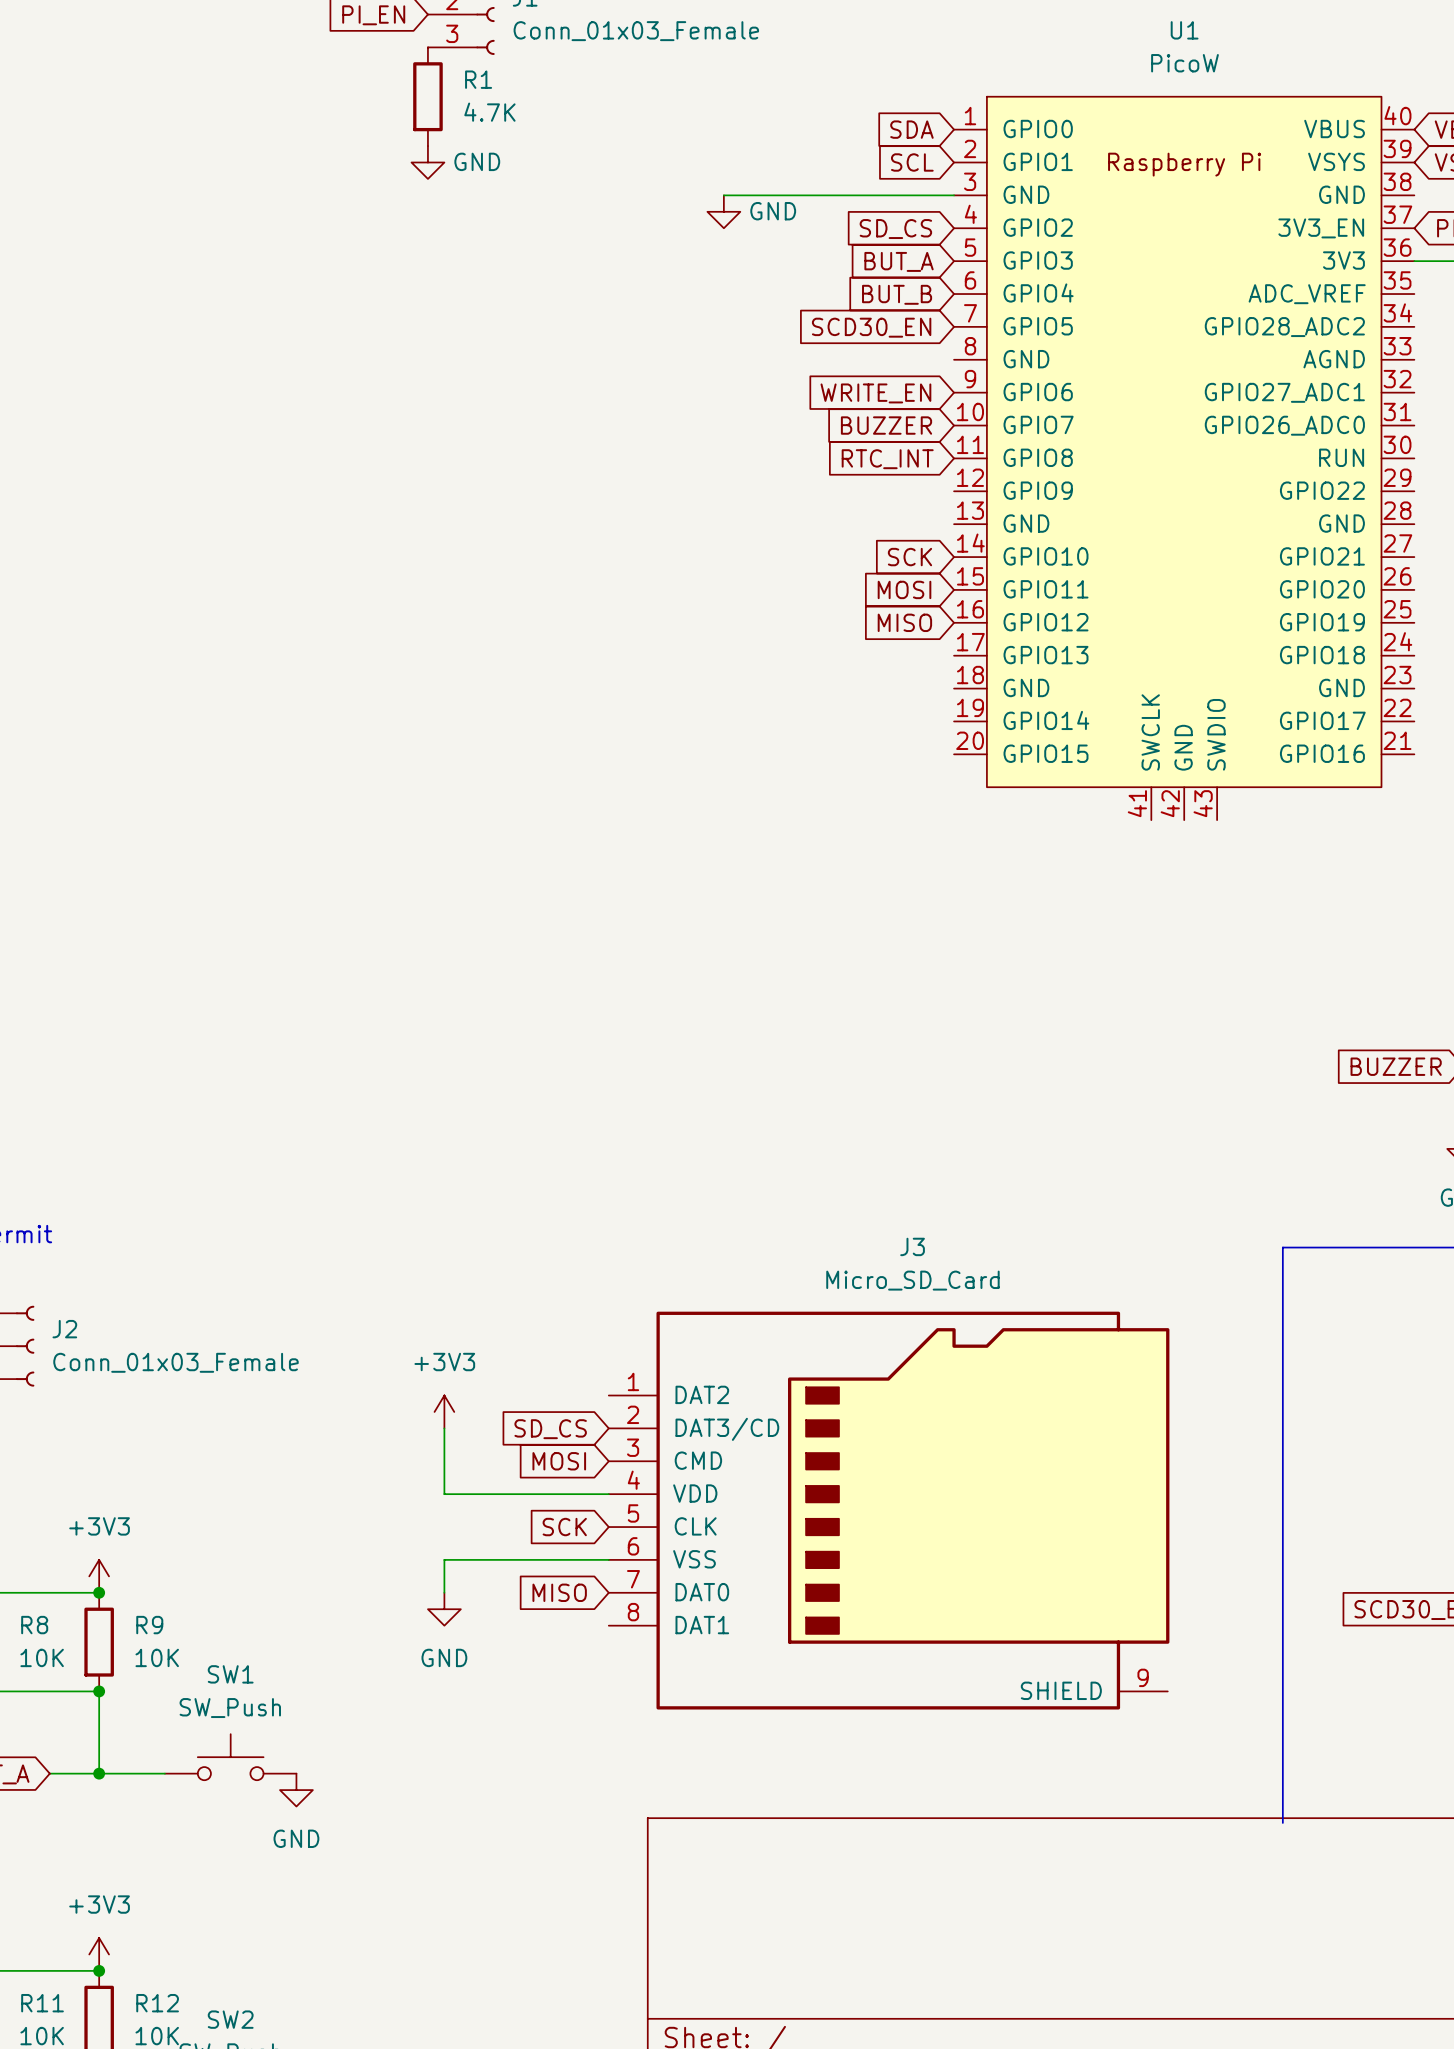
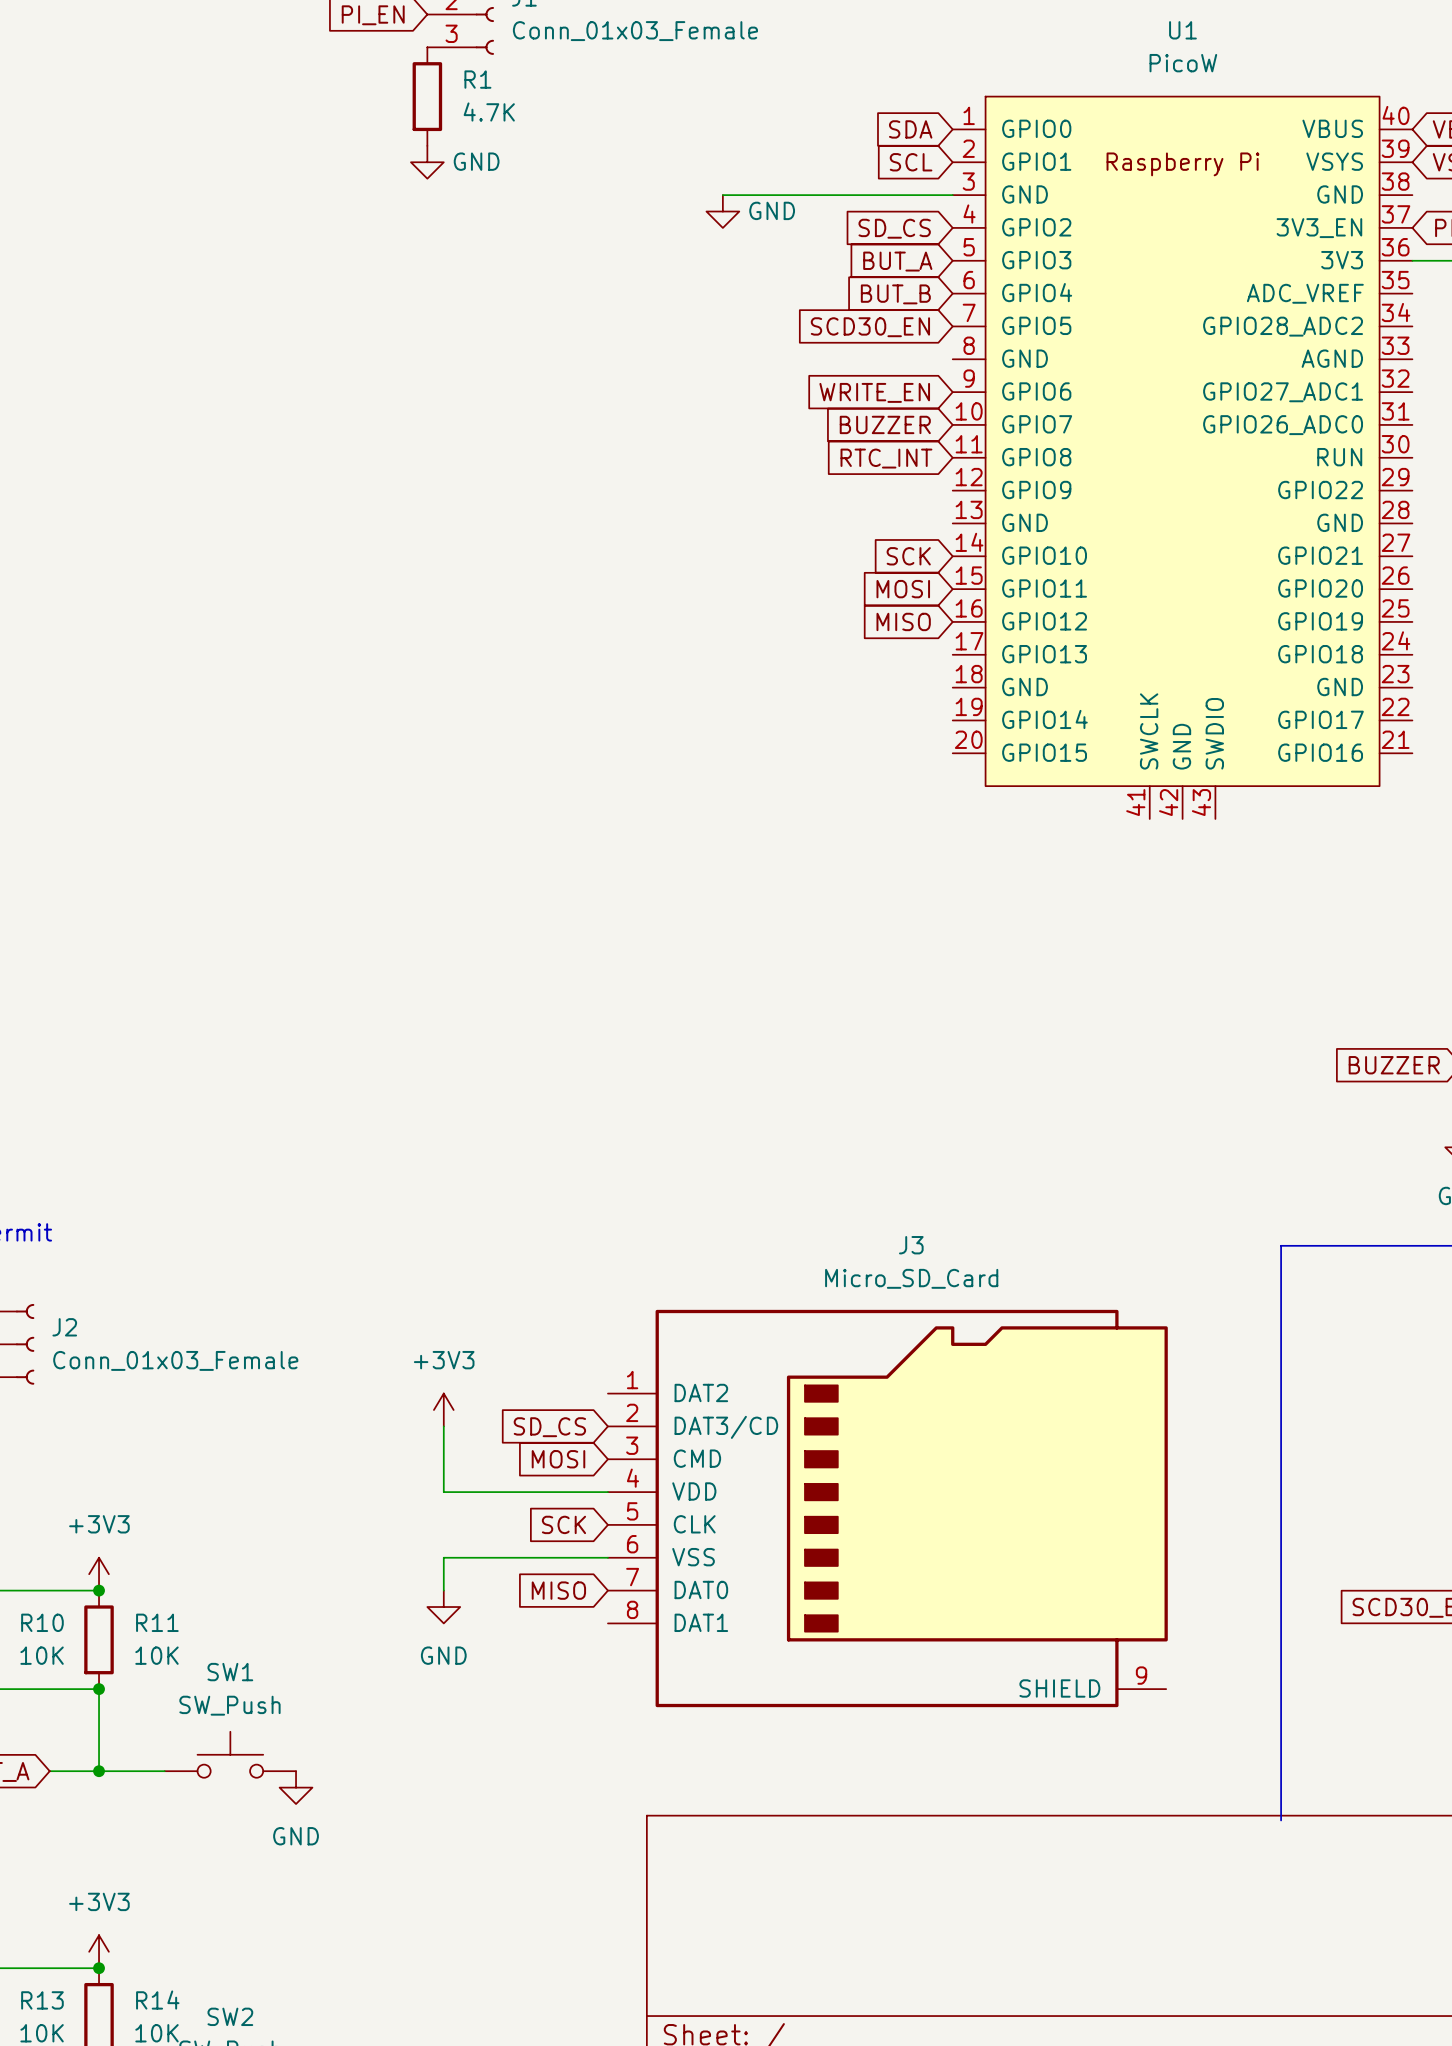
R8 name: R8 (34, 1625) -> R10 (42, 1622)
R9 name: R9 (149, 1625) -> R11 (157, 1622)
R11 name: R11 (42, 2003) -> R13 (42, 2000)
R12 name: R12 (157, 2003) -> R14 (157, 2000)

